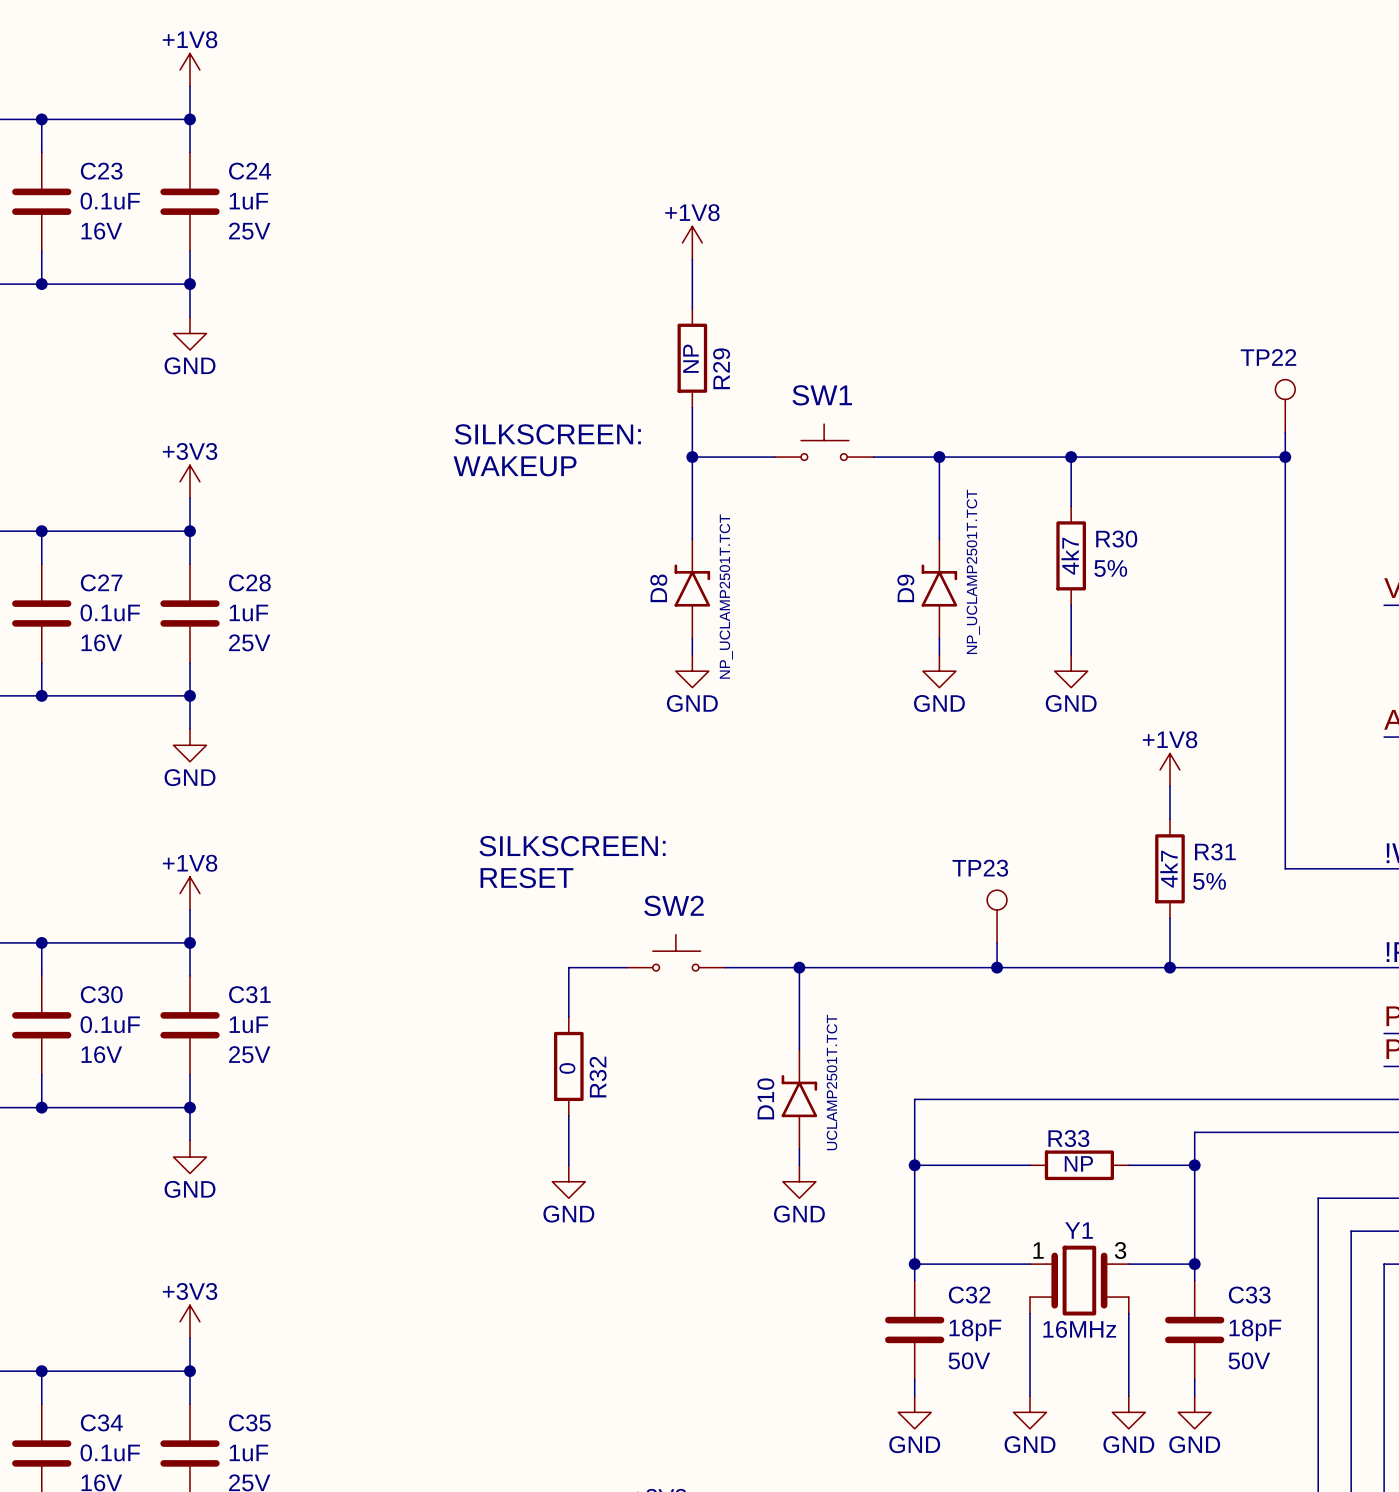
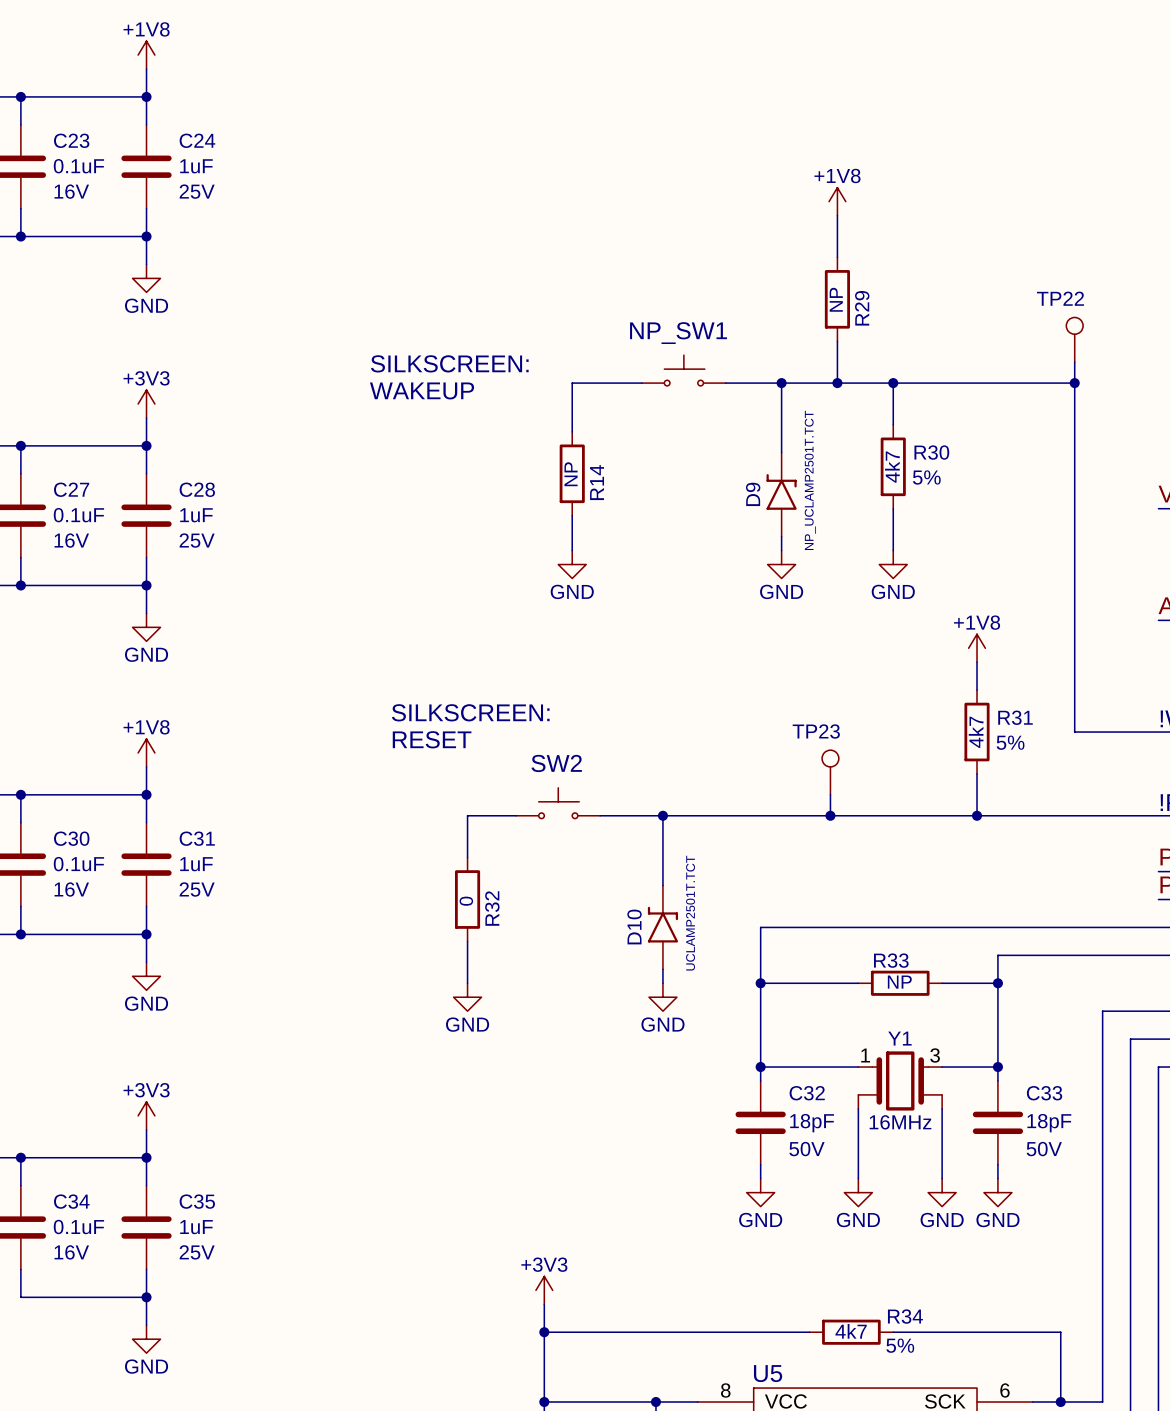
power symbol position: +1V8 (692, 242) -> +1V8 (837, 201)
wire: (692, 259) (692, 308) -> (837, 215) (837, 257)
R29 position: (692, 358) -> (837, 299)
SW1 name: SW1 (822, 395) -> NP_SW1 (678, 333)
wire: (692, 407) (692, 457) -> (837, 341) (837, 383)
junction: (692, 457) -> none
junction: none -> (837, 383)
R14: none -> (572, 473)
D8: NP_UCLAMP2501T.TCT (692, 588) -> none

